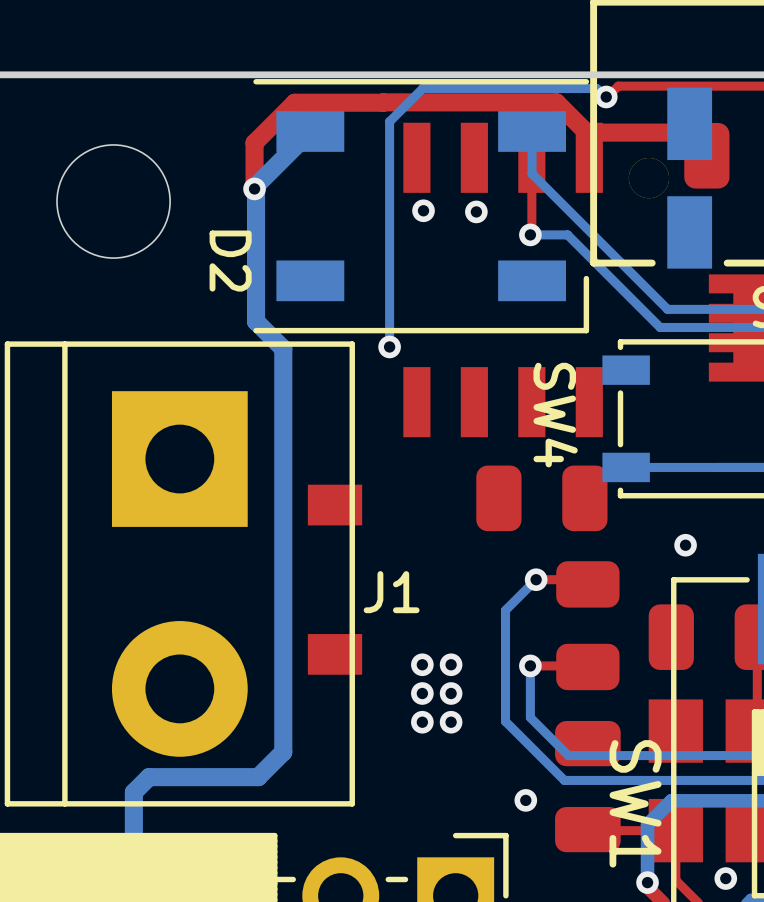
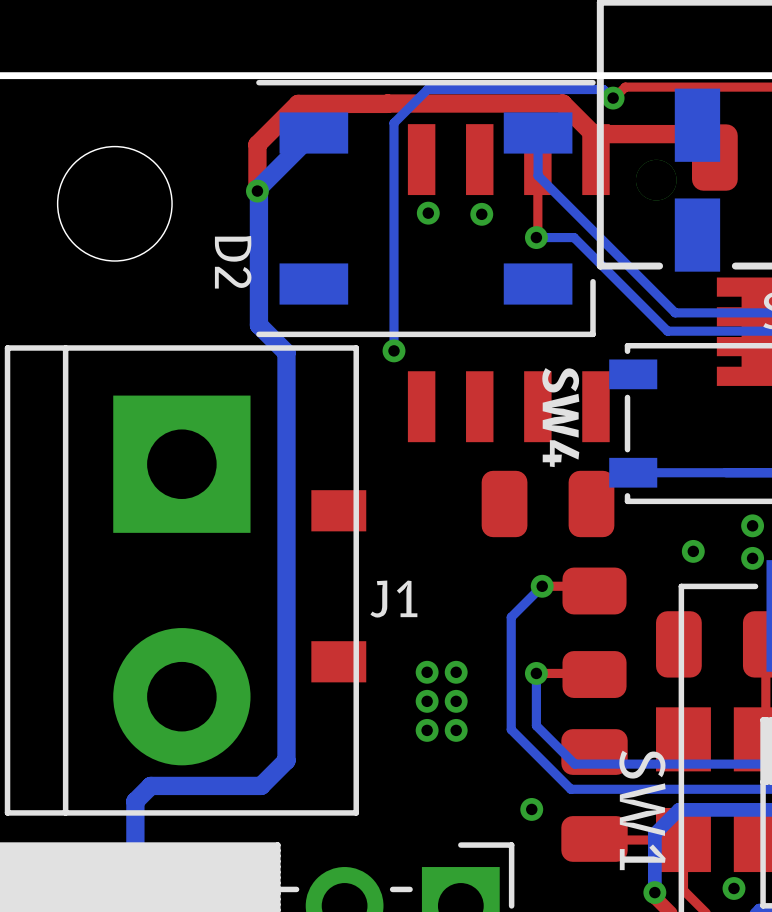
via: none -> (752, 525)
via: none -> (752, 558)

